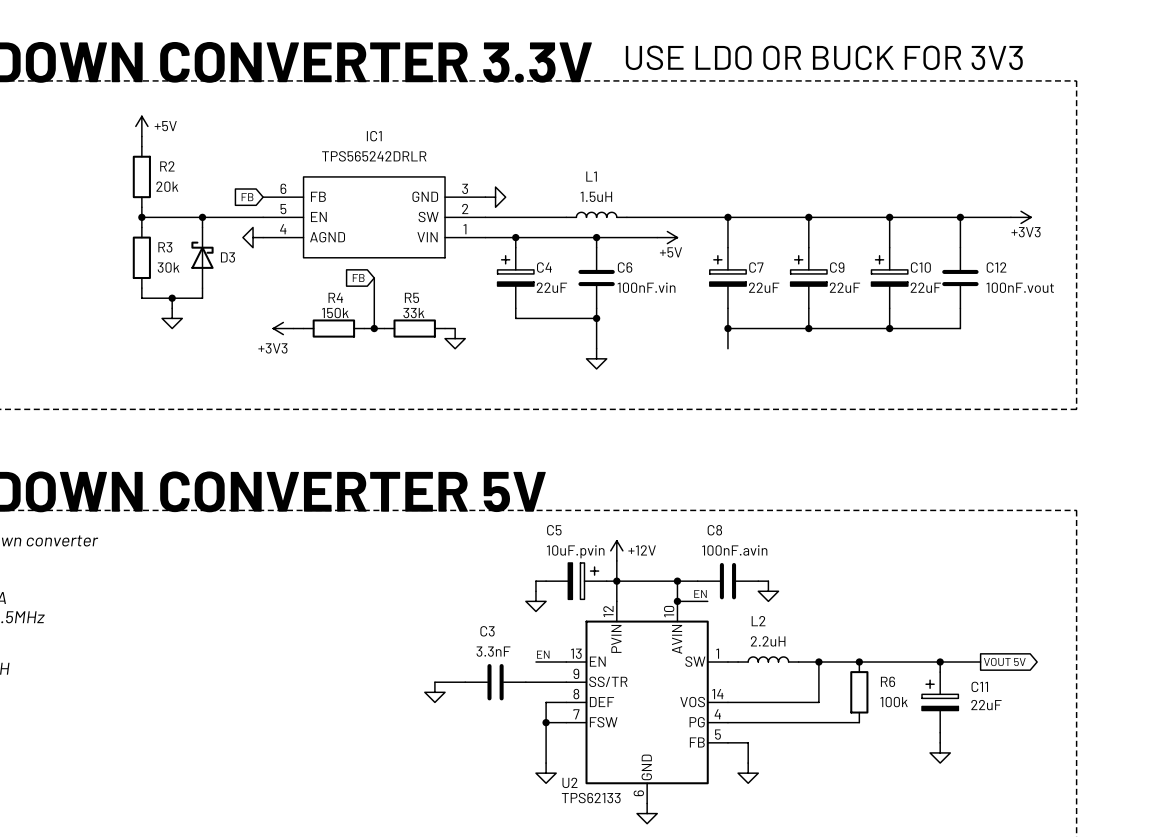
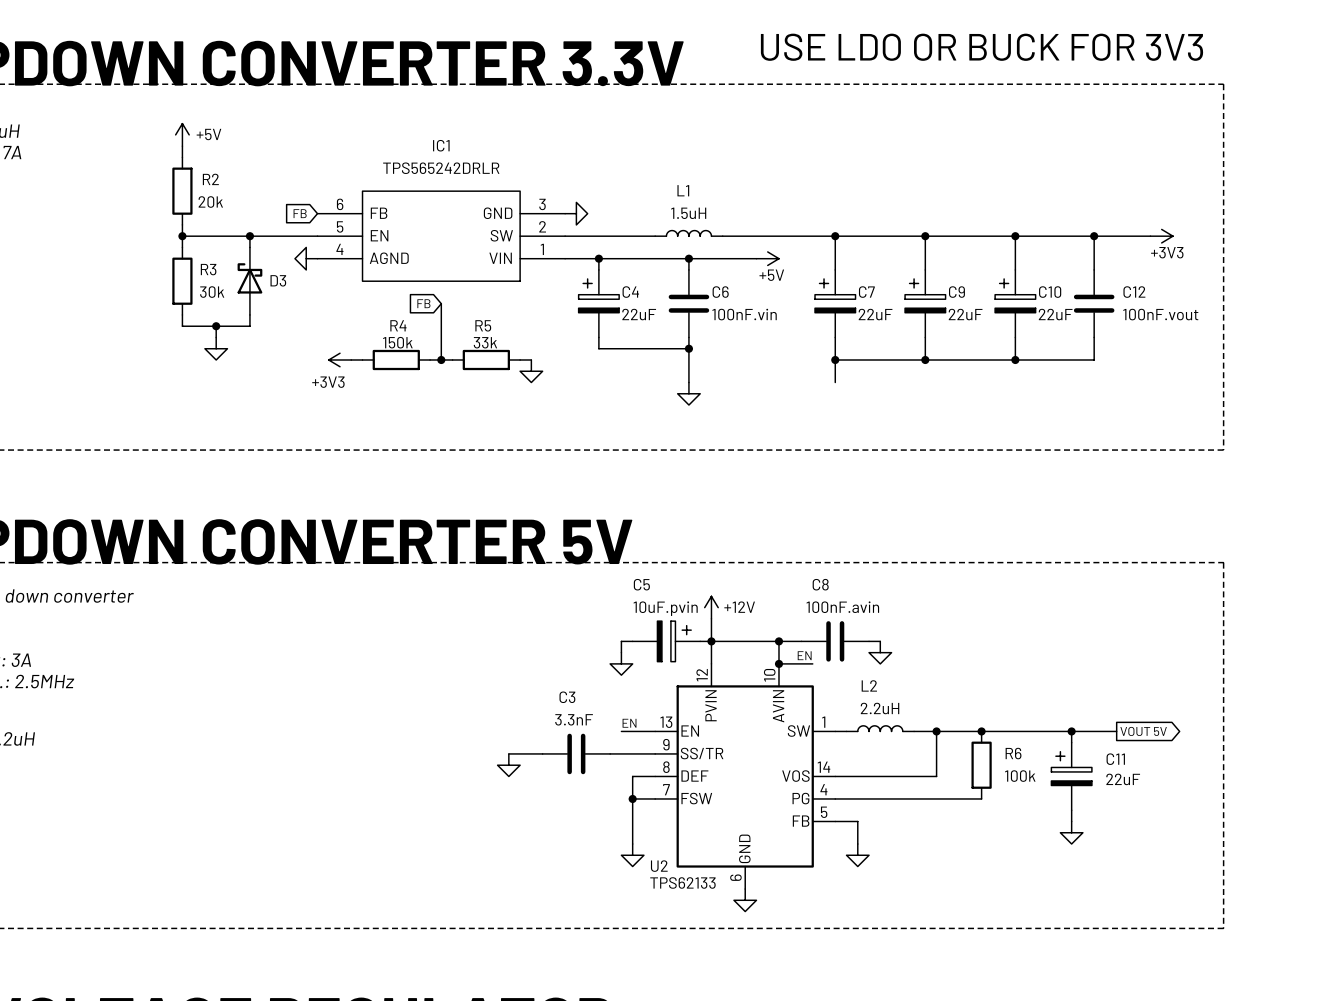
text position: USE LDO OR BUCK FOR 3V3 (824, 57) -> USE LDO OR BUCK FOR 3V3 (982, 47)

